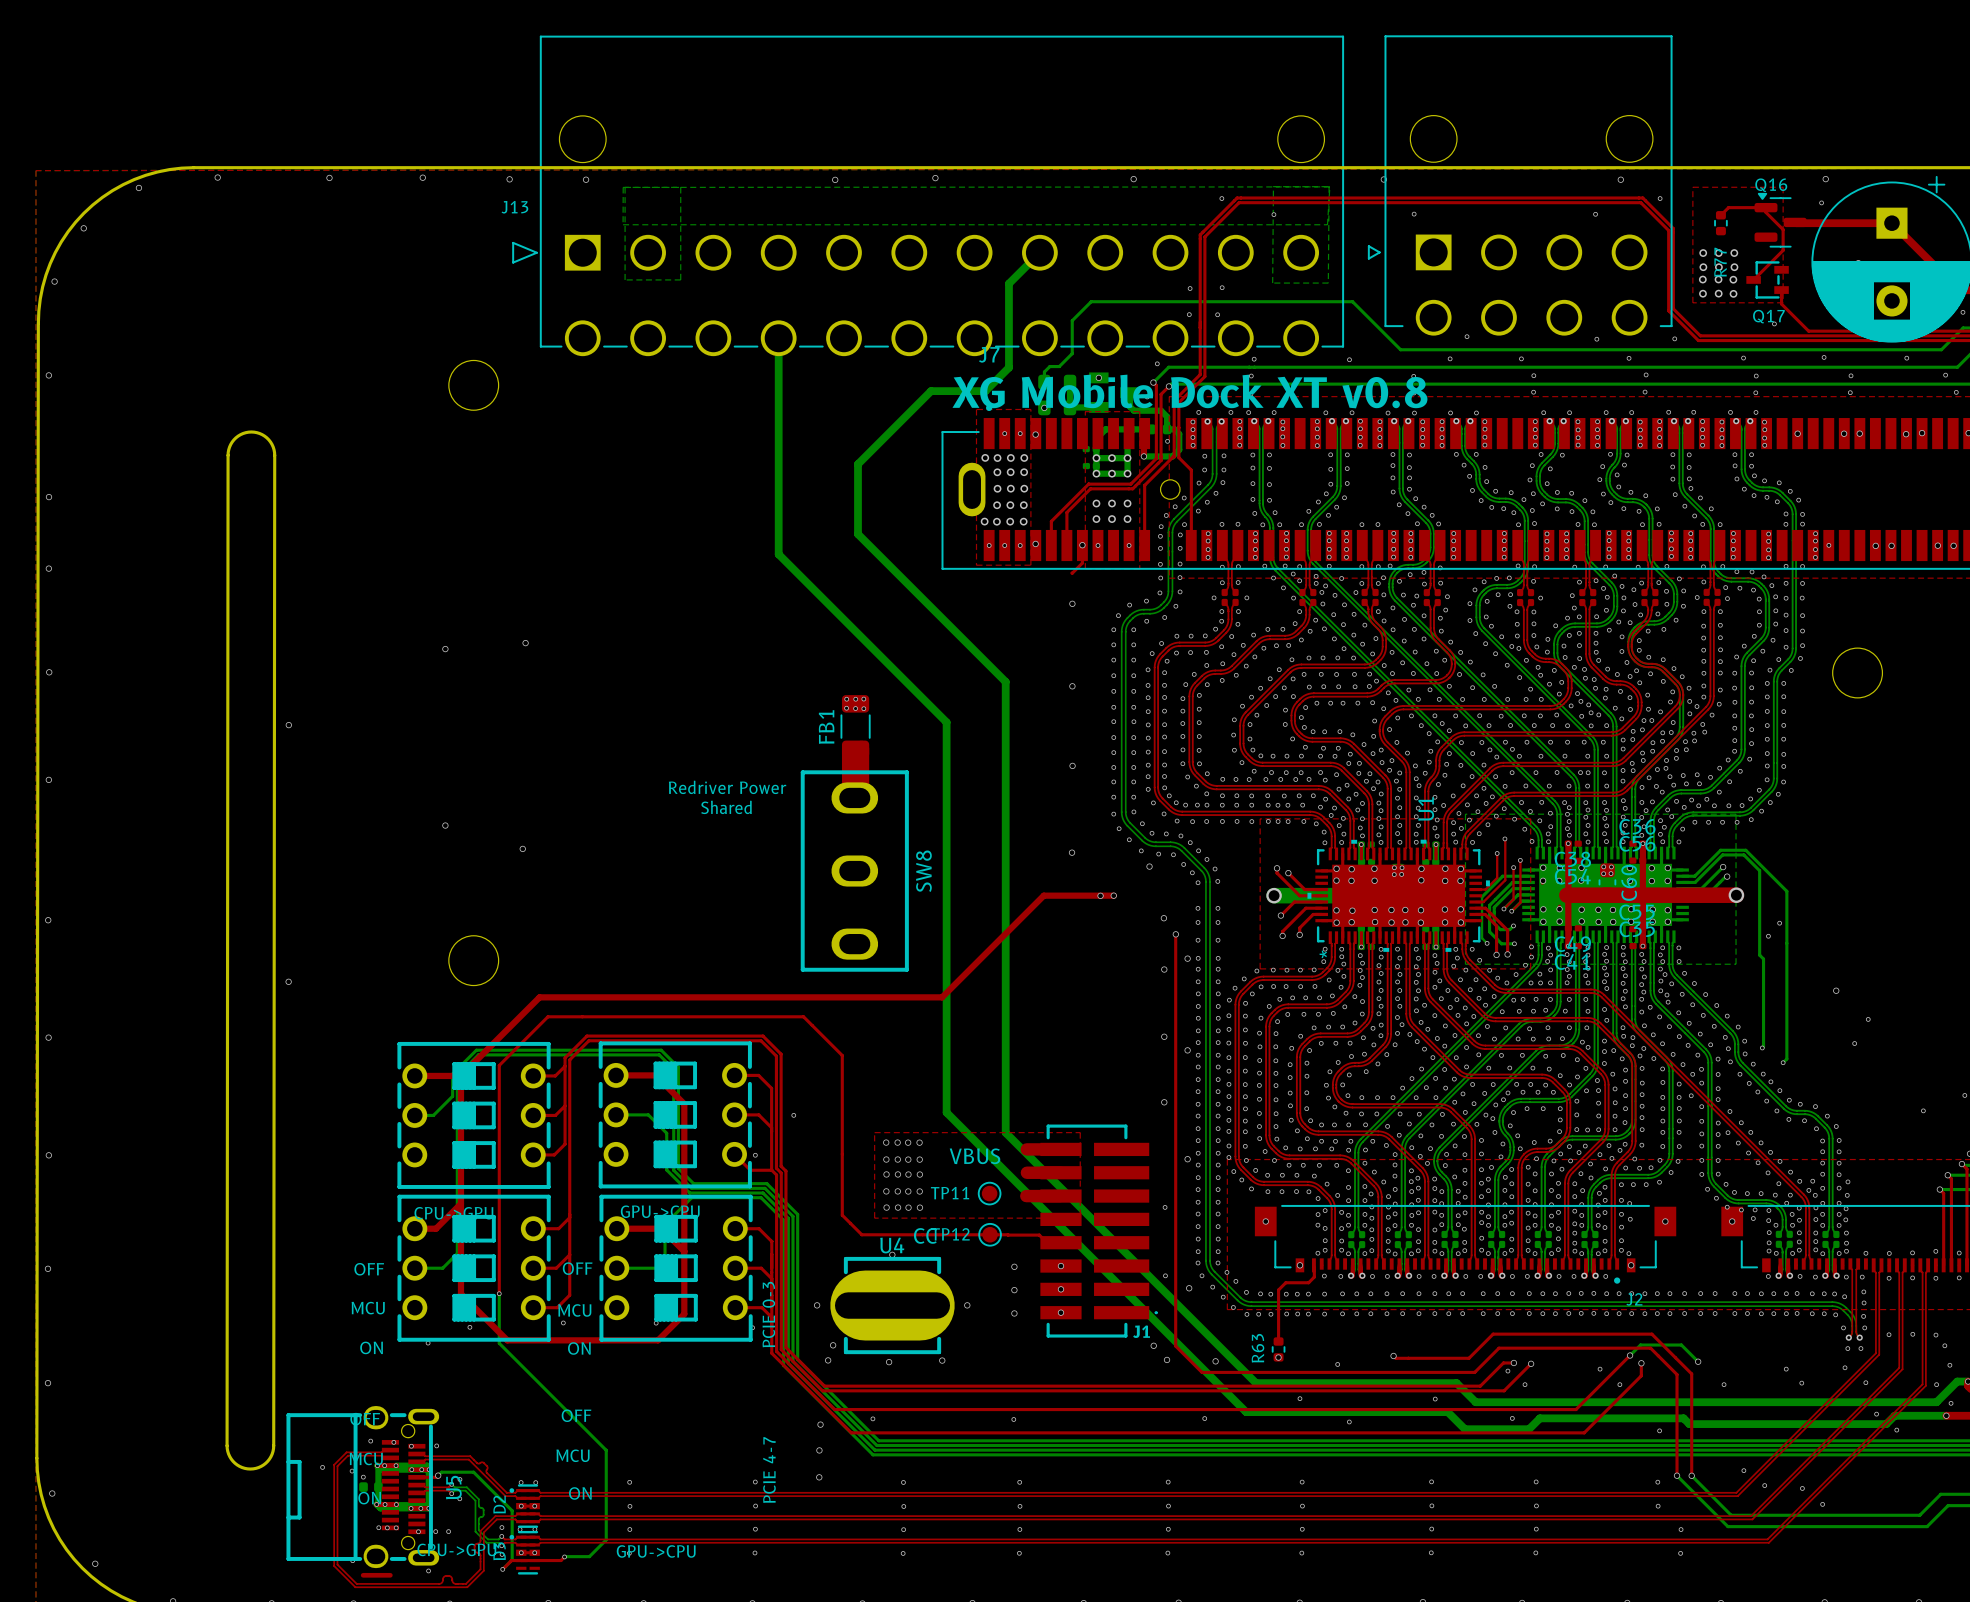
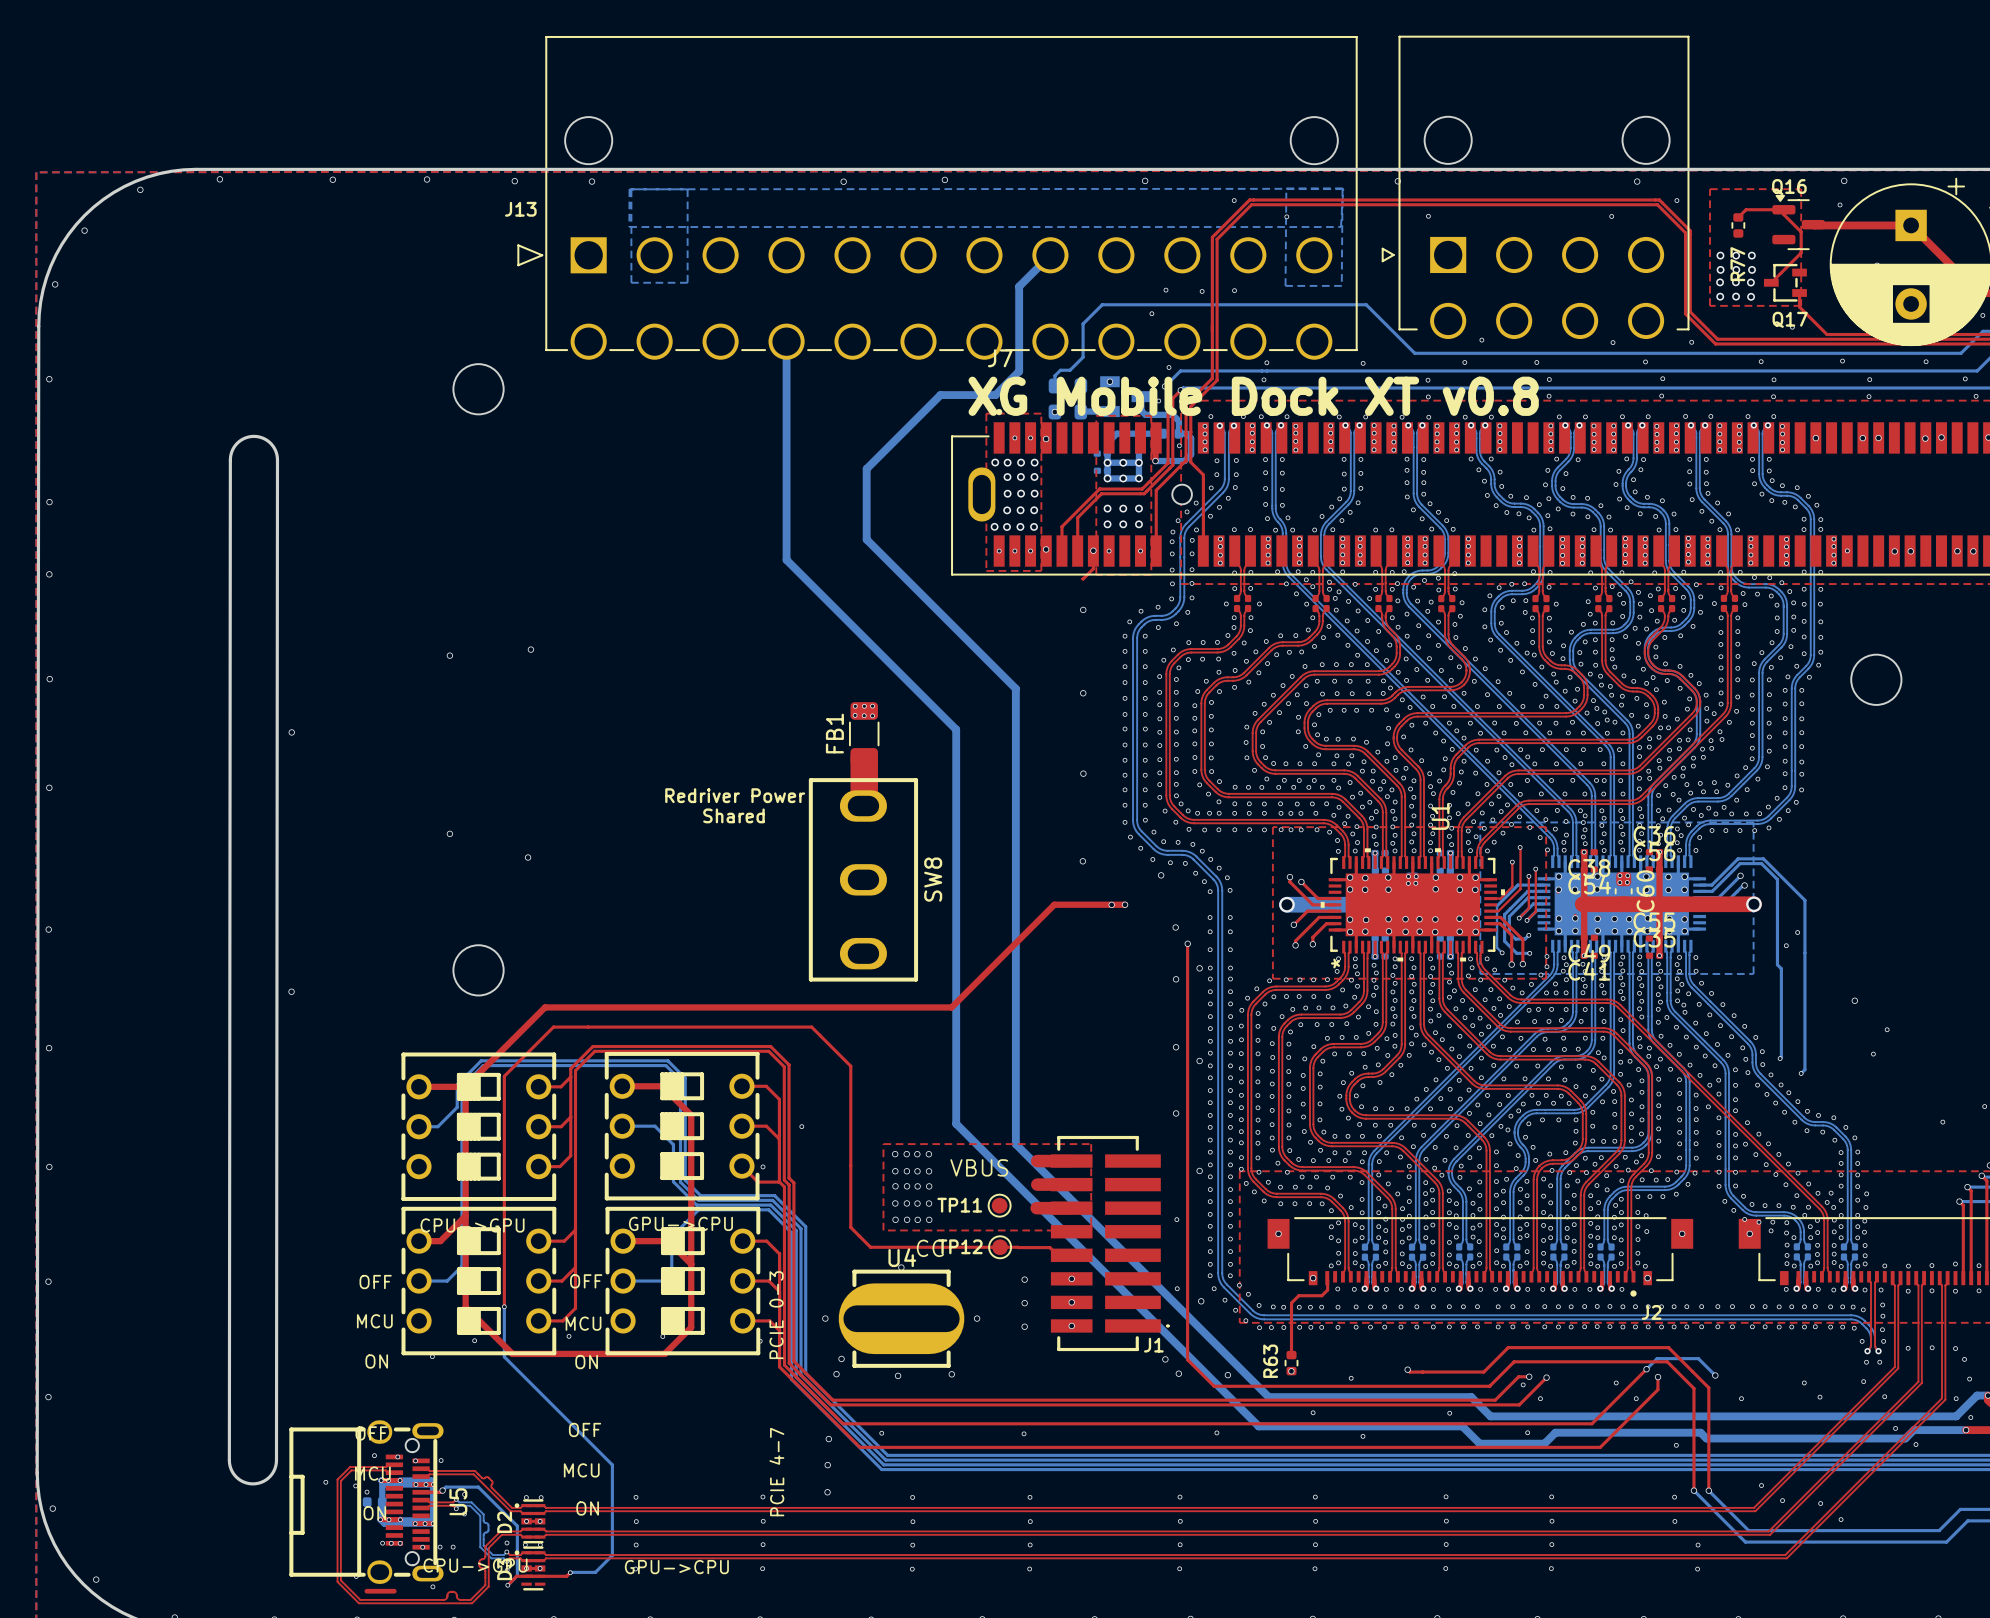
via: none -> (1165, 290)
via: none -> (1151, 313)
via: (1189, 314) -> none
via: (1217, 314) -> none

